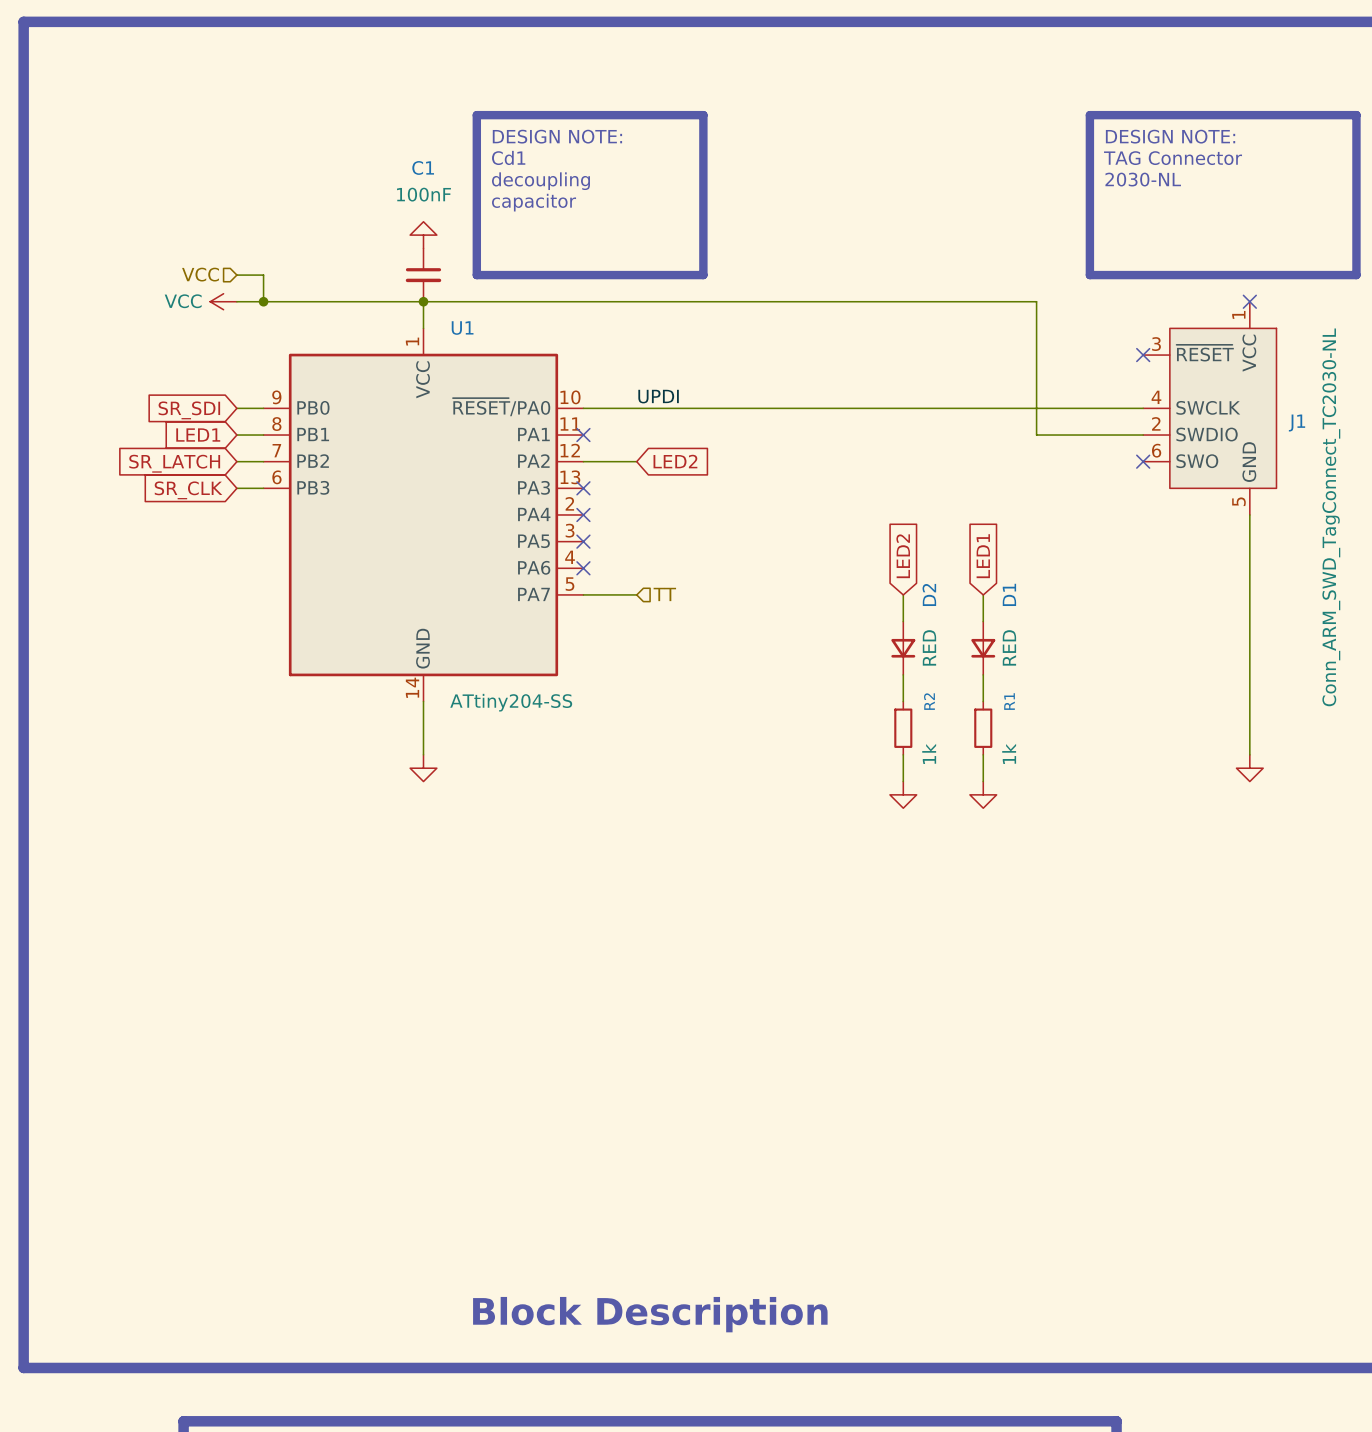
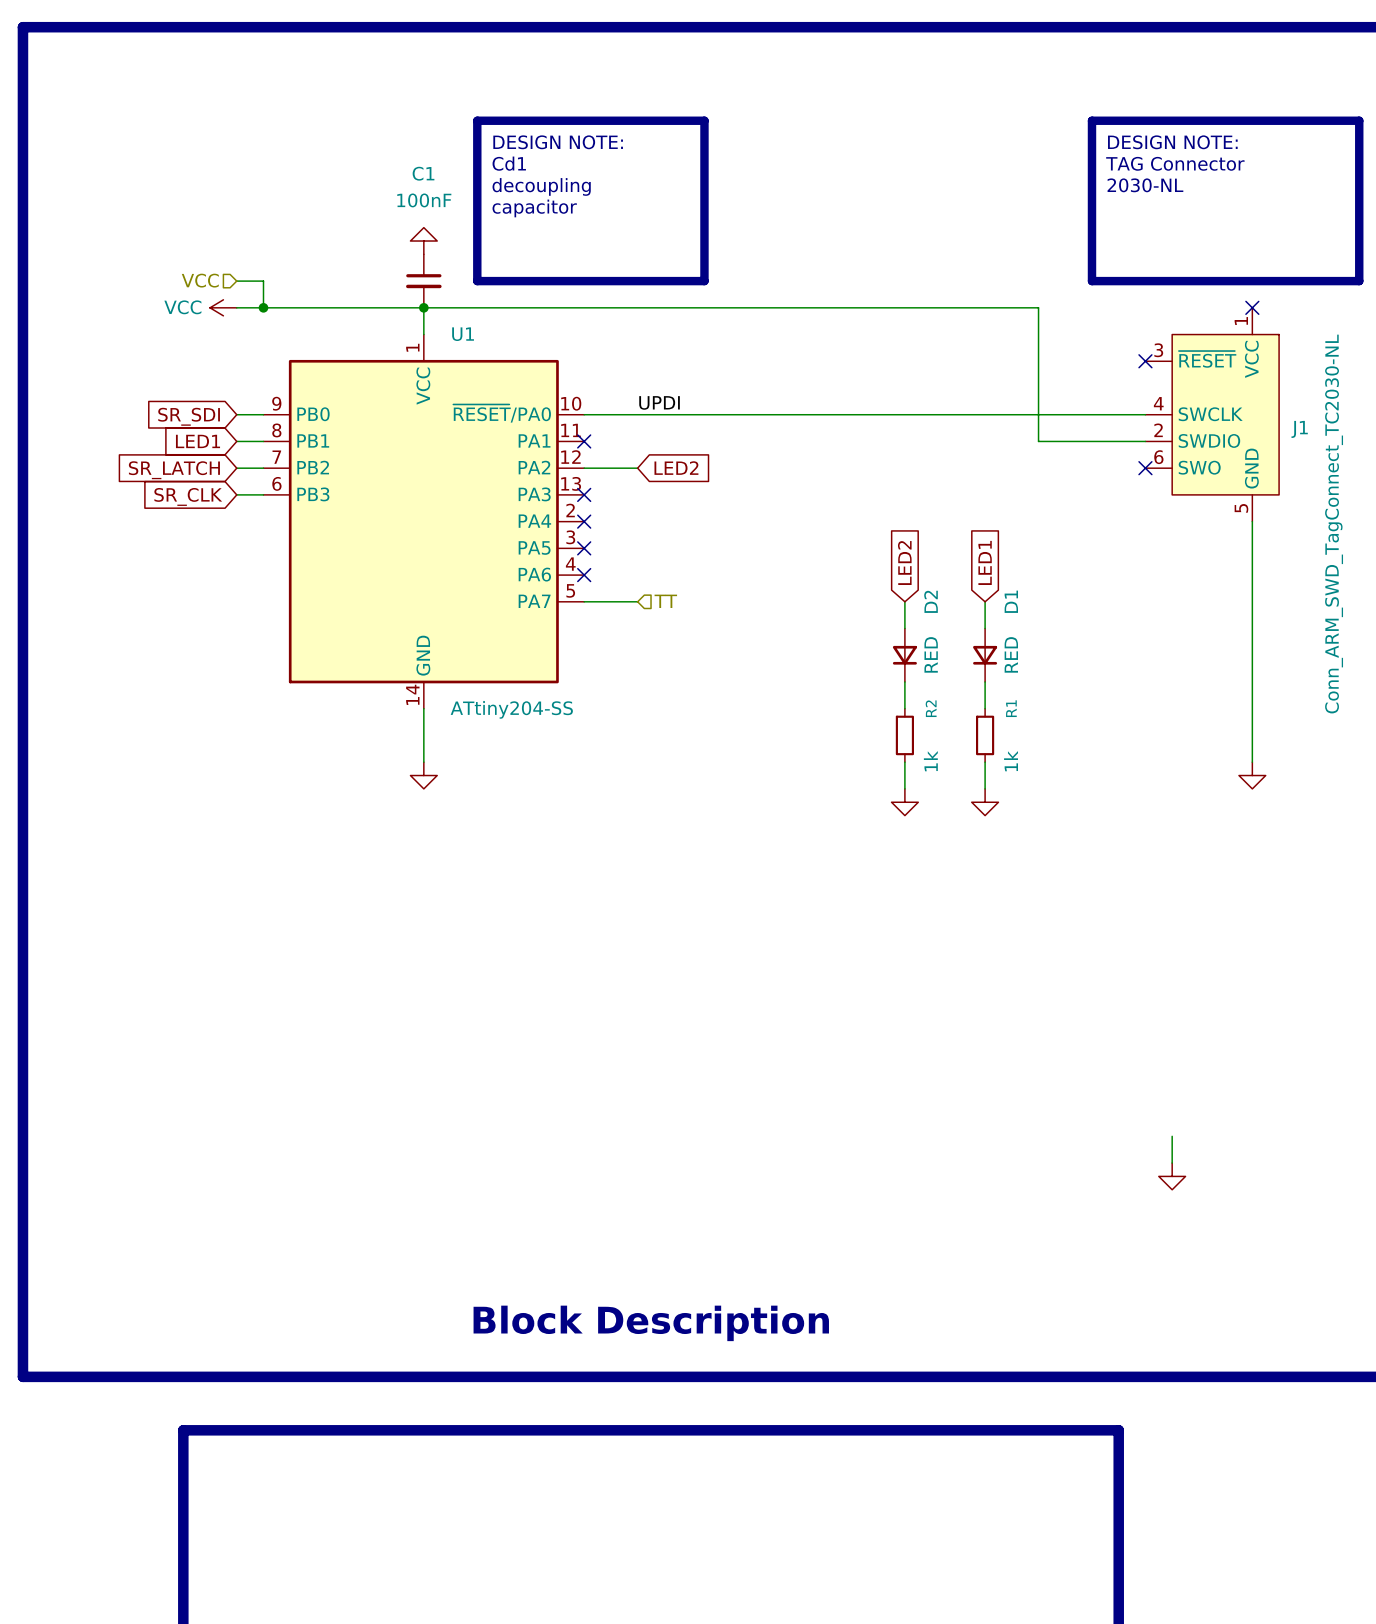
wire: none -> (1172, 1136) (1172, 1163)
power symbol: none -> (1172, 1176)

